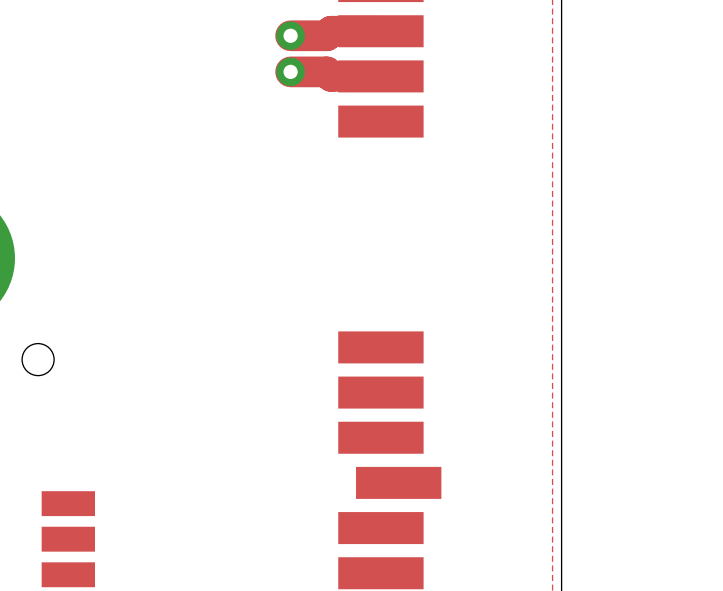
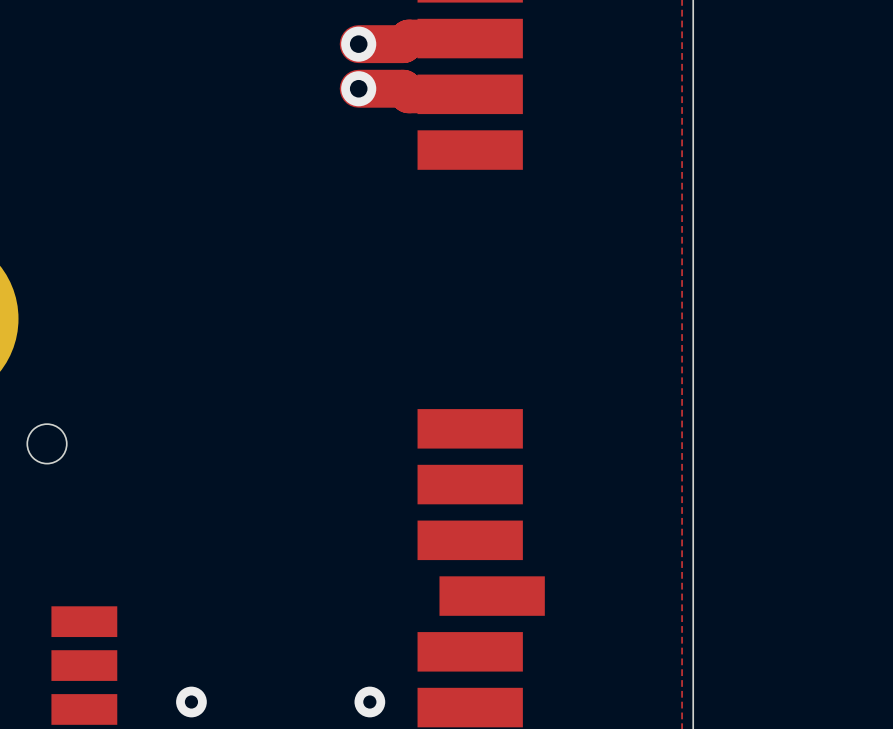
via: none -> (191, 702)
via: none -> (369, 702)

